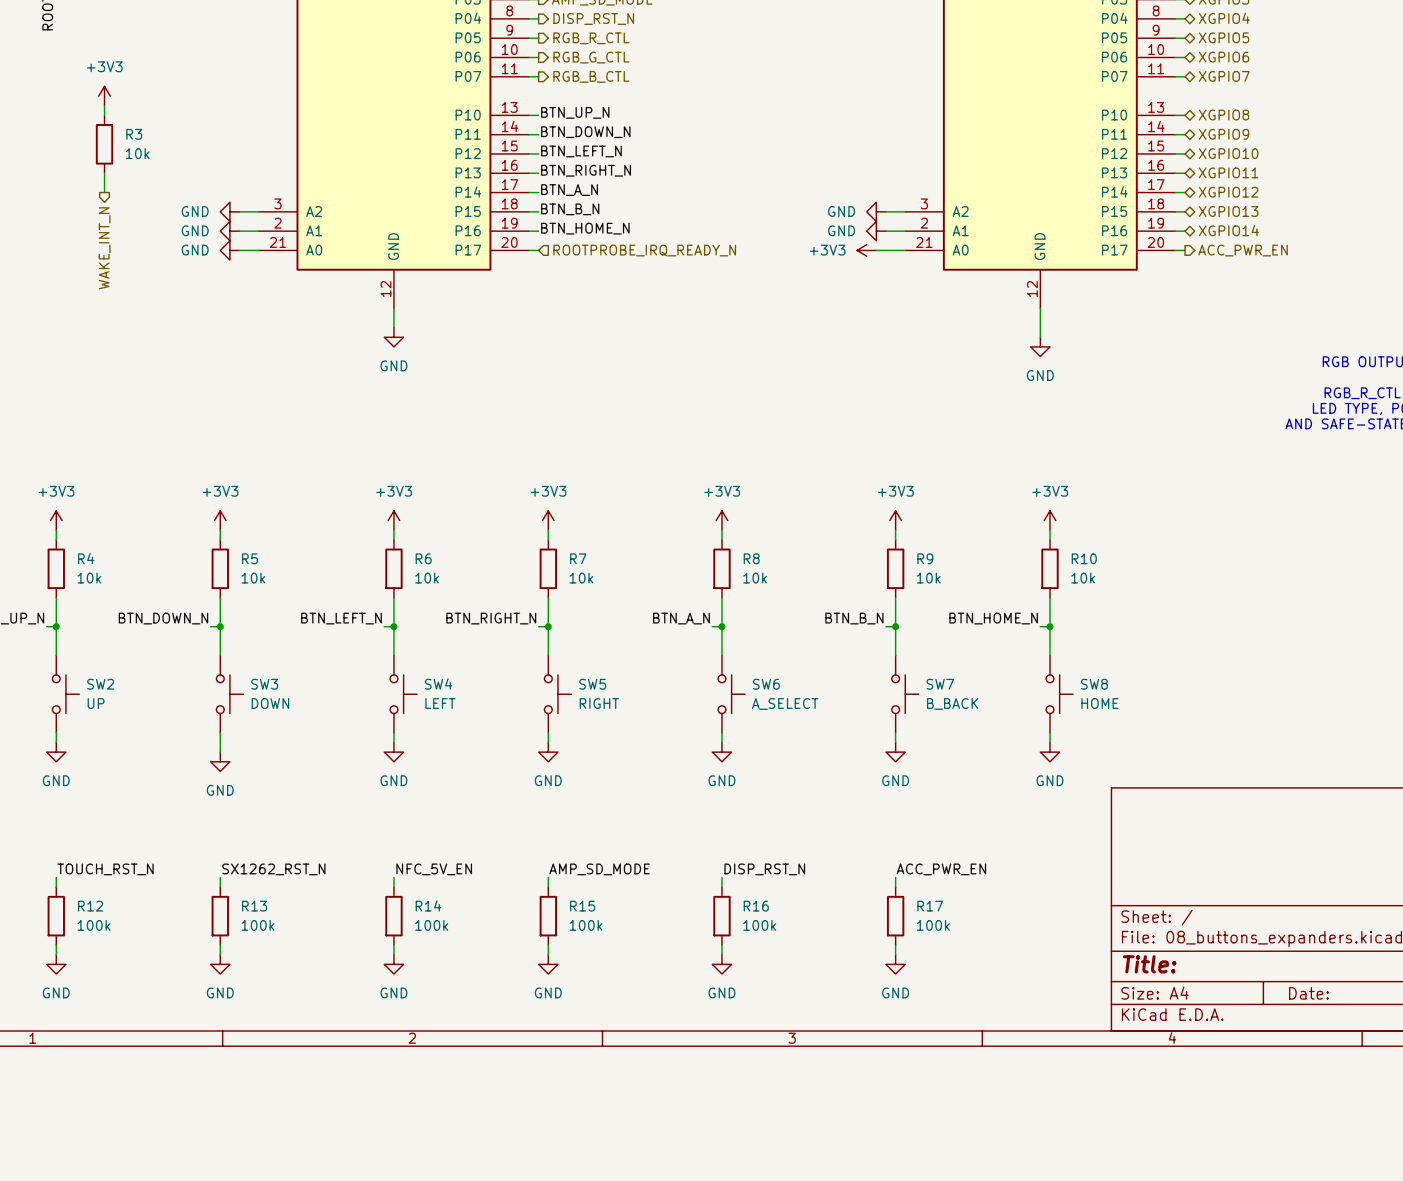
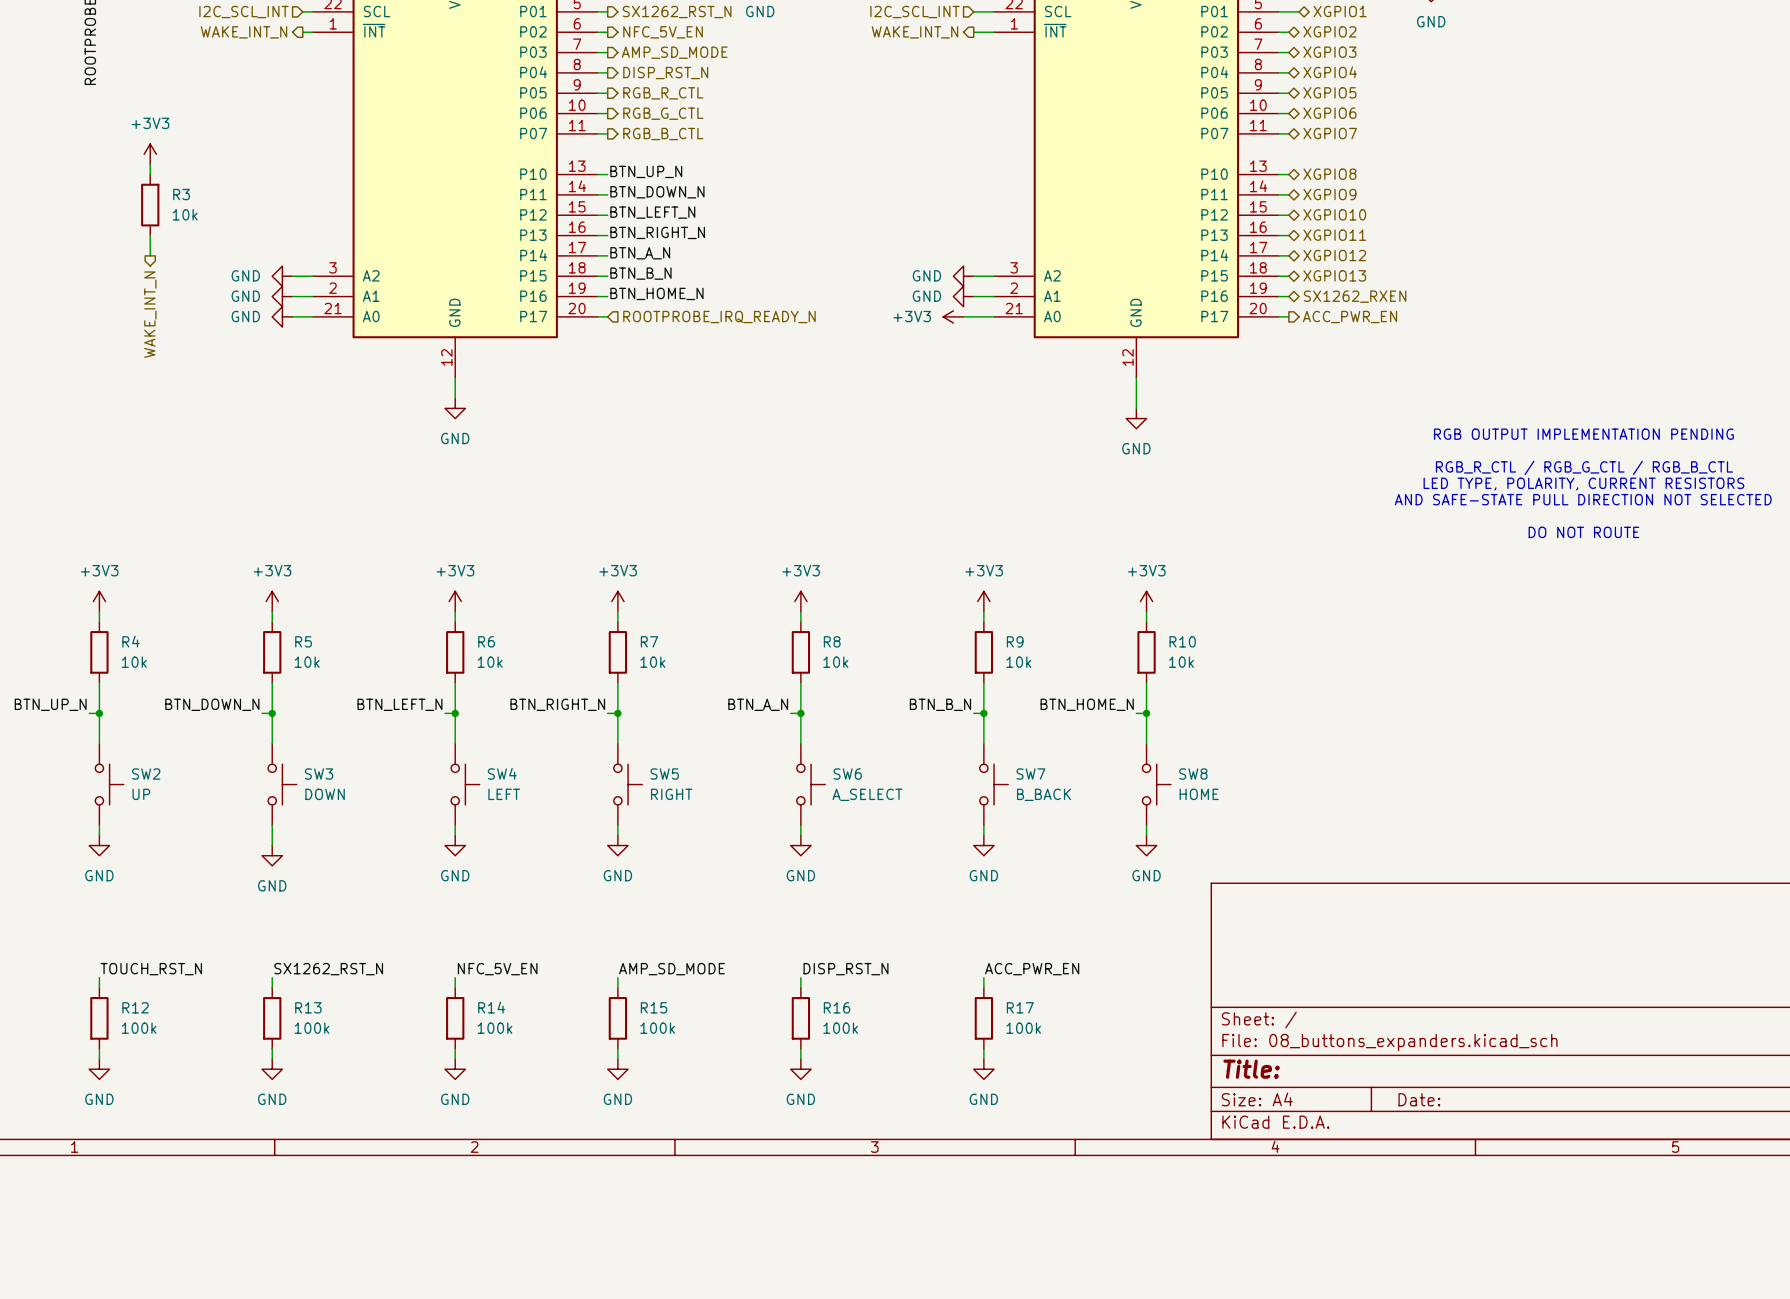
hierarchical label: XGPIO14 (1228, 230) -> SX1262_RXEN (1355, 296)

